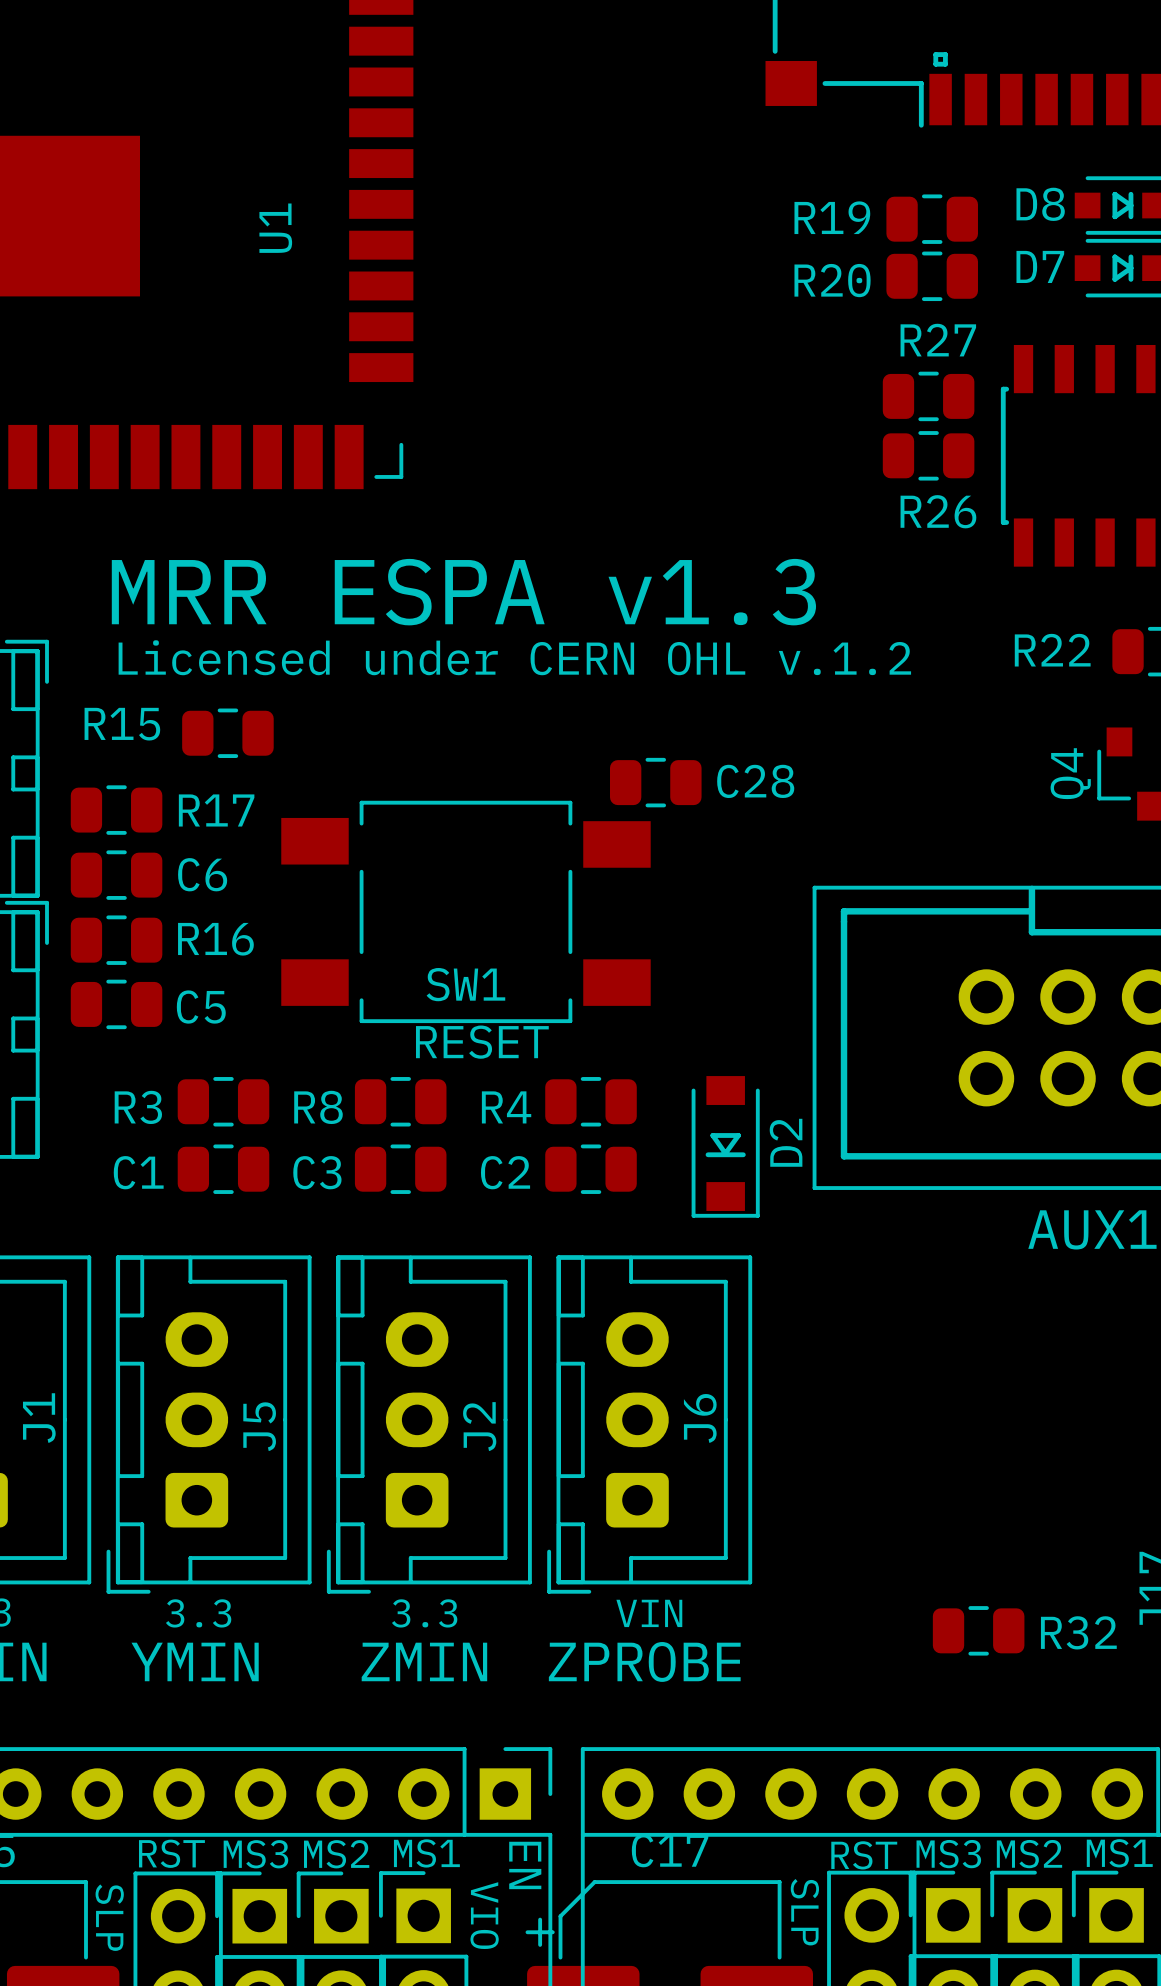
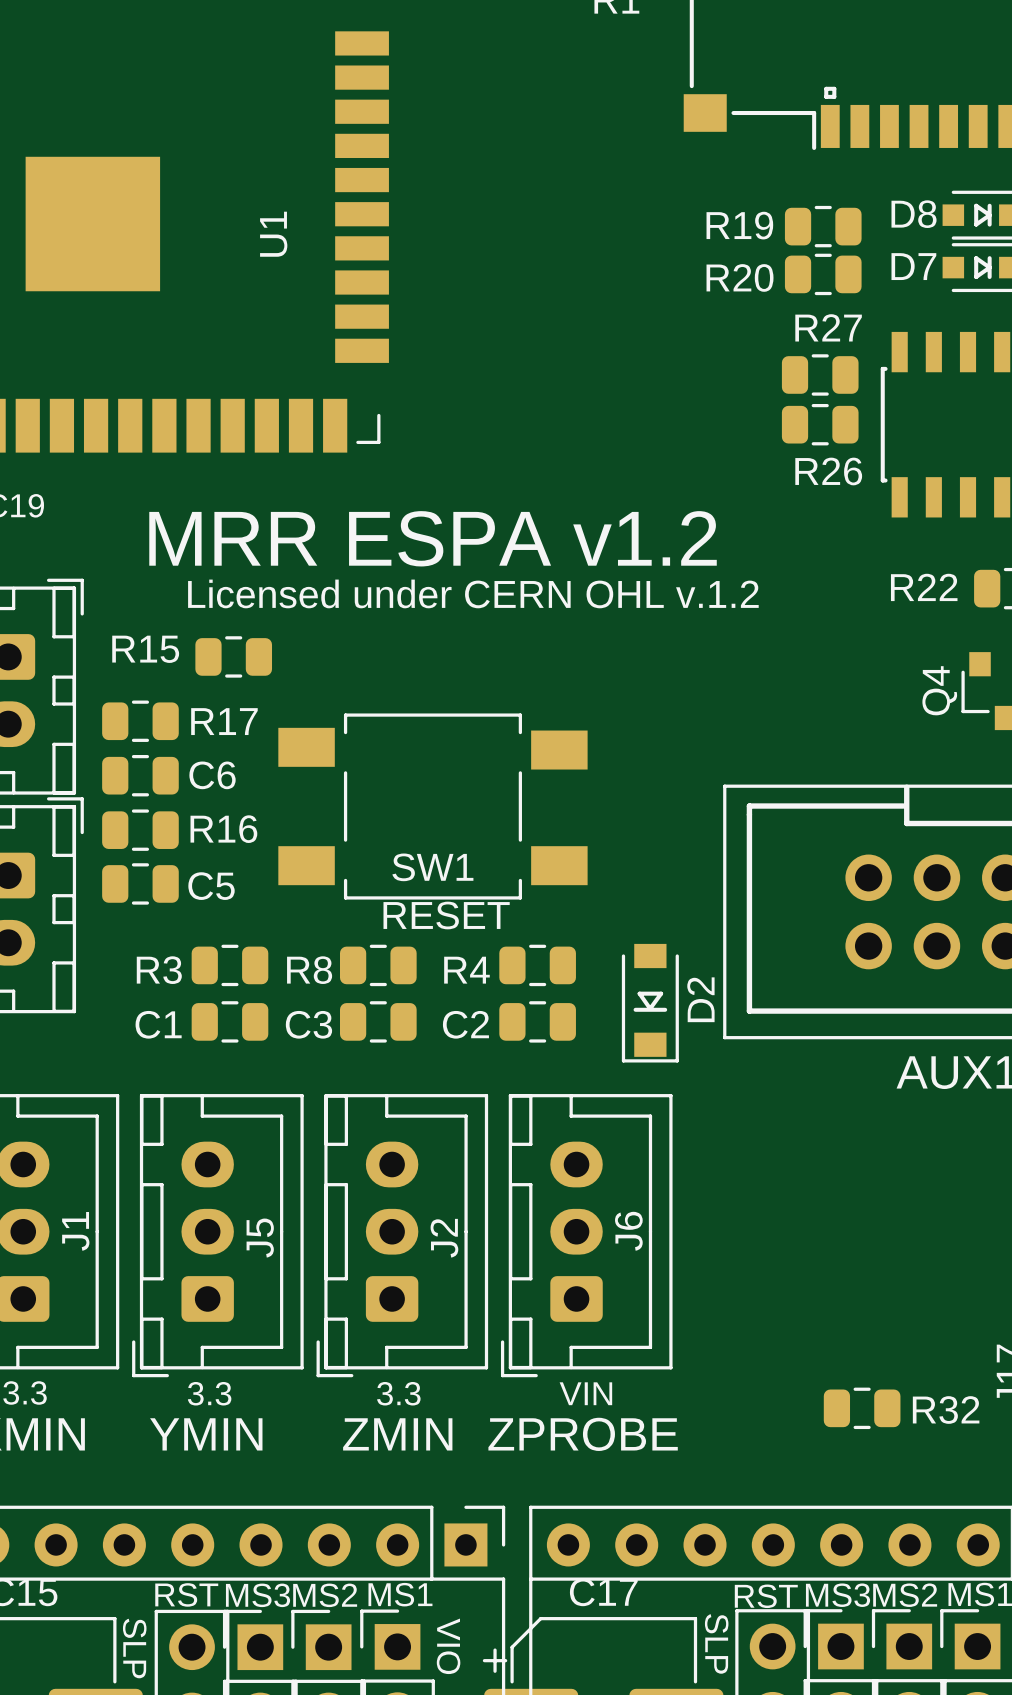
text: MRR ESPA v1.3 (463, 592) -> MRR ESPA v1.2 (433, 538)
C28: (655, 782) -> none
text: EN (525, 1865) -> none

